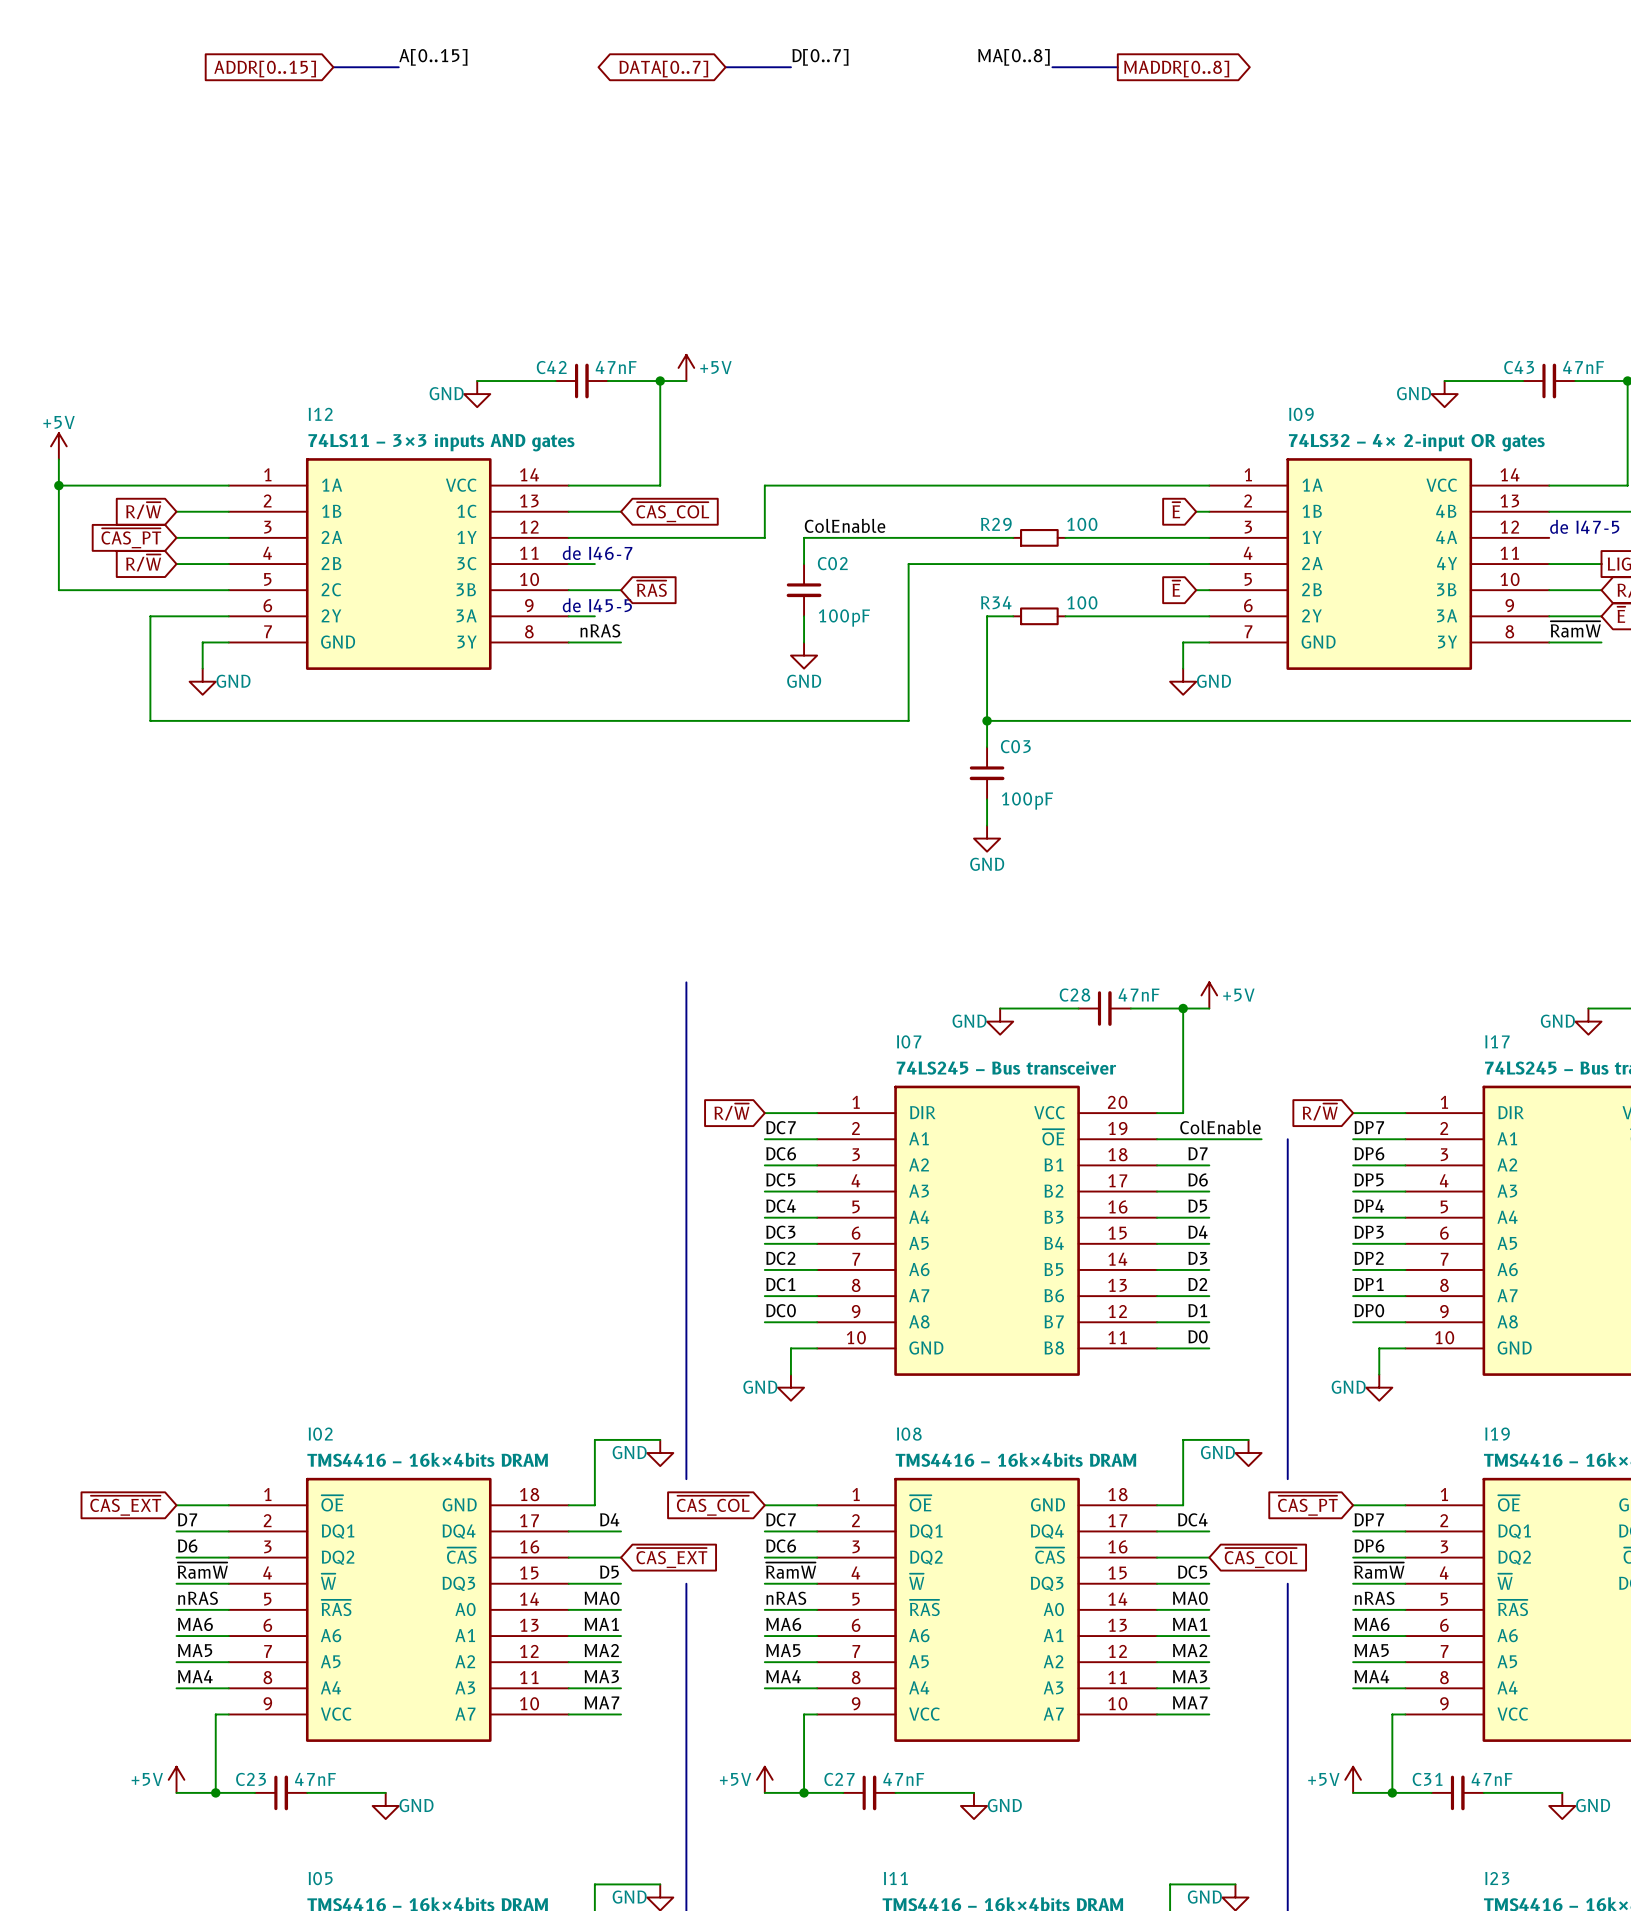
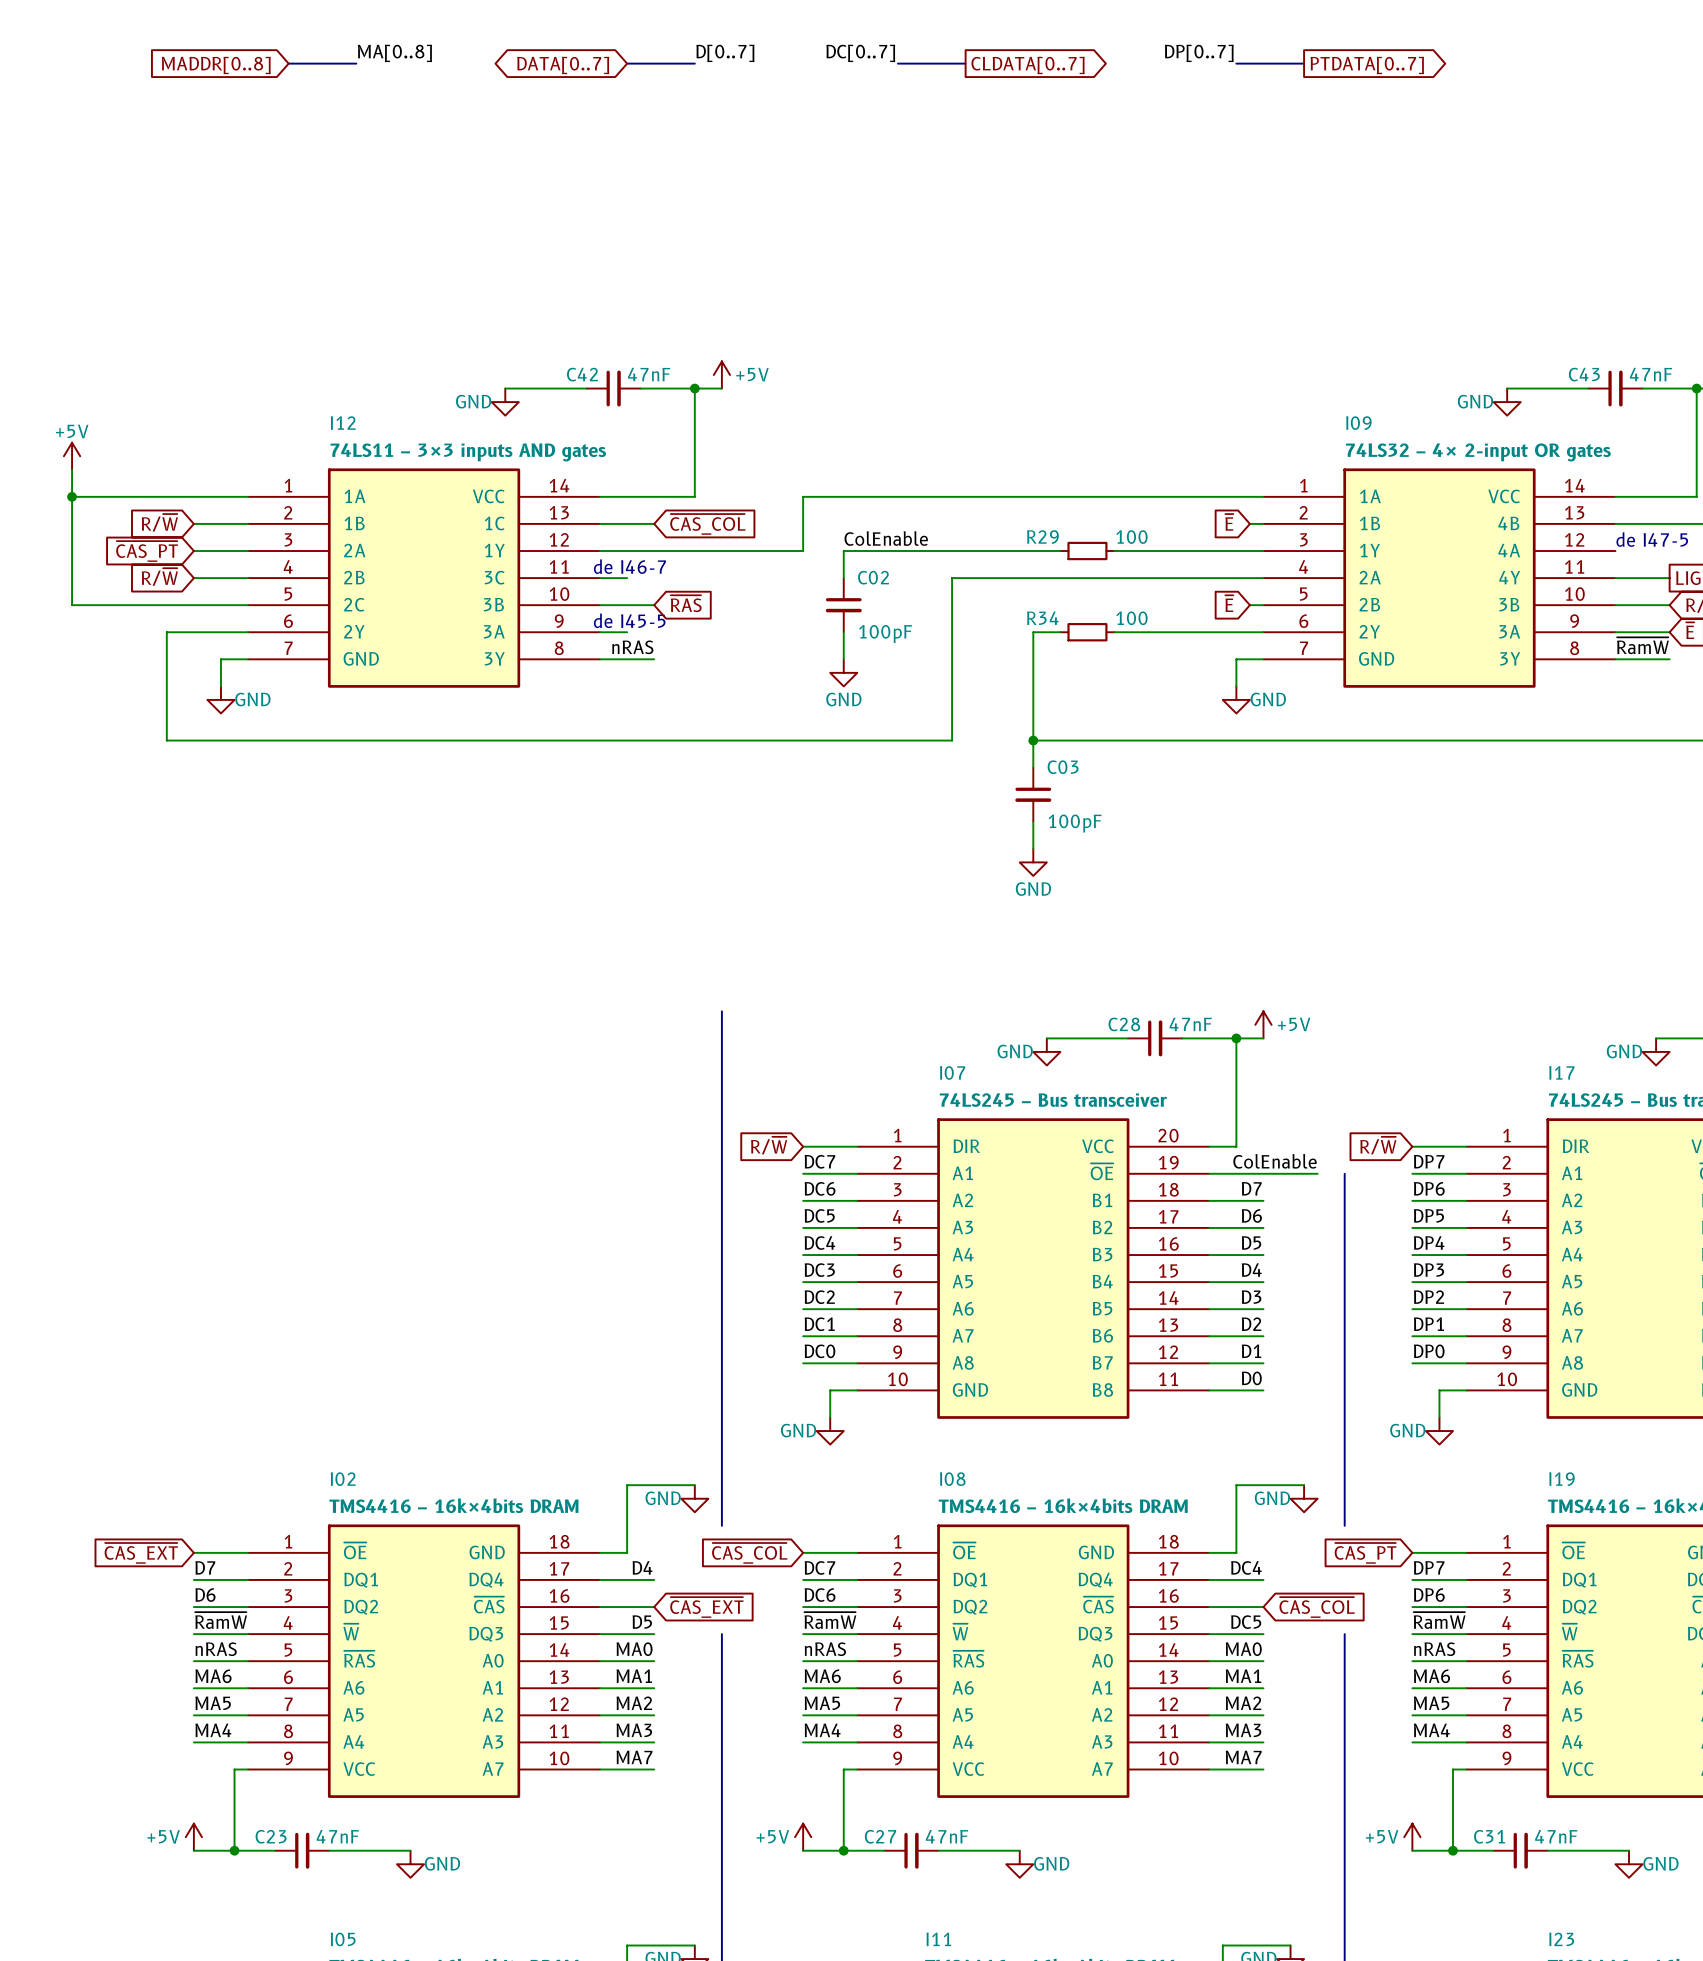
label: A[0..15] (433, 57) -> MA[0..8] (394, 53)
label position: D[0..7] (820, 57) -> D[0..7] (725, 53)
label: none -> DC[0..7] (860, 53)
label: MA[0..8] (1014, 57) -> none
label: none -> DP[0..7] (1199, 53)
bus: (333, 67) (398, 67) -> (356, 63) (288, 63)
bus: none -> (627, 63) (694, 63)
bus: (725, 67) (790, 67) -> (897, 63) (965, 63)
bus: (1052, 67) (1117, 67) -> (1236, 63) (1304, 63)
global label: ADDR[0..15] (265, 69) -> MADDR[0..8] (216, 65)
global label position: DATA[0..7] (663, 69) -> DATA[0..7] (563, 65)
global label: none -> CLDATA[0..7] (1028, 65)
global label: MADDR[0..8] (1176, 69) -> none
global label: none -> PTDATA[0..7] (1367, 65)

